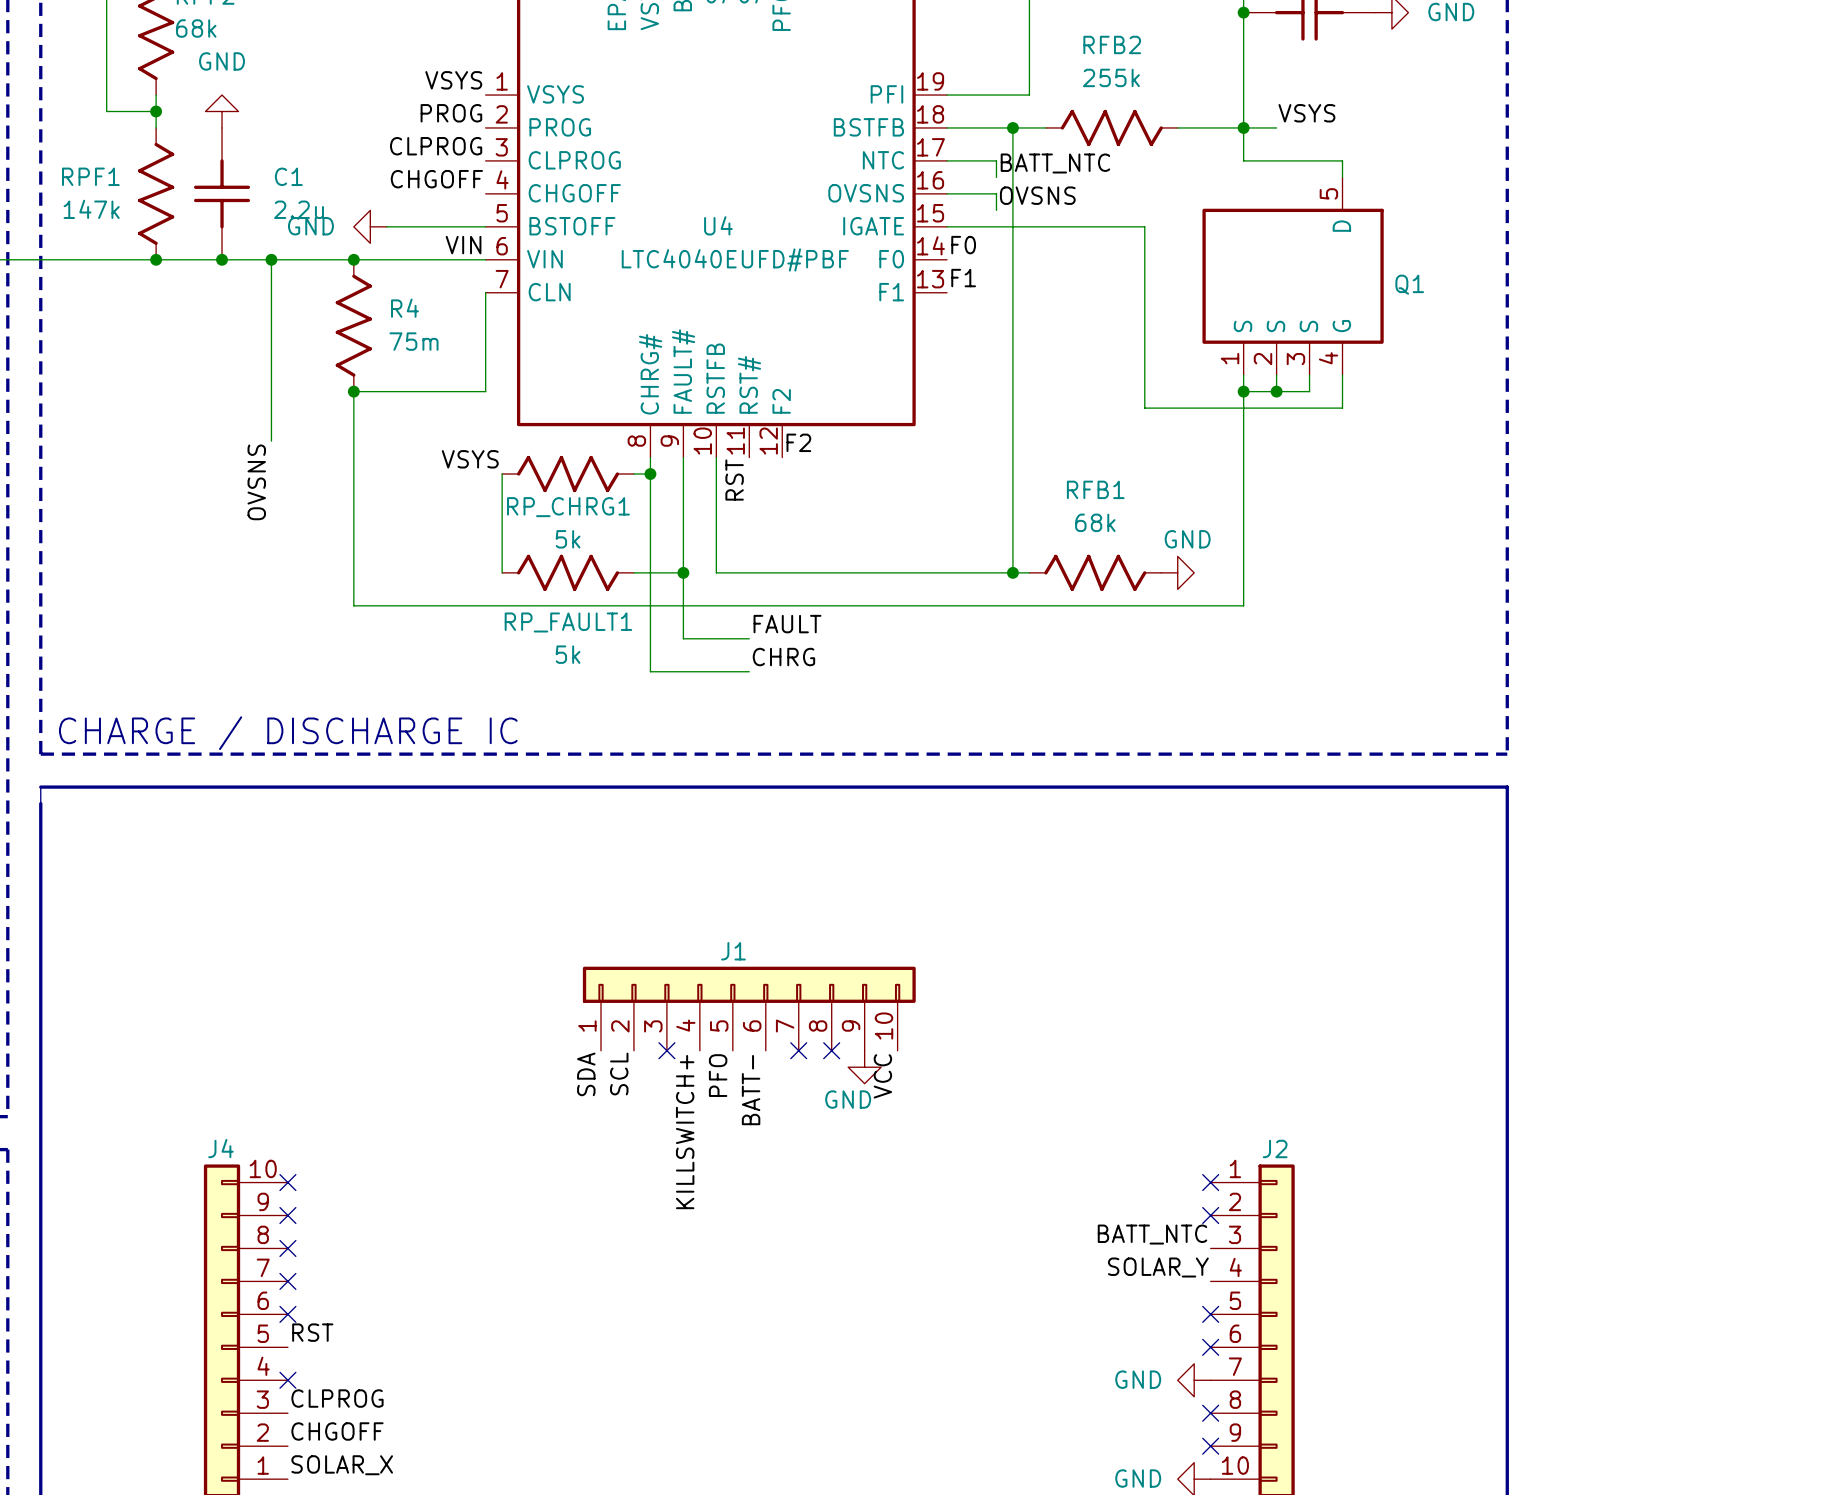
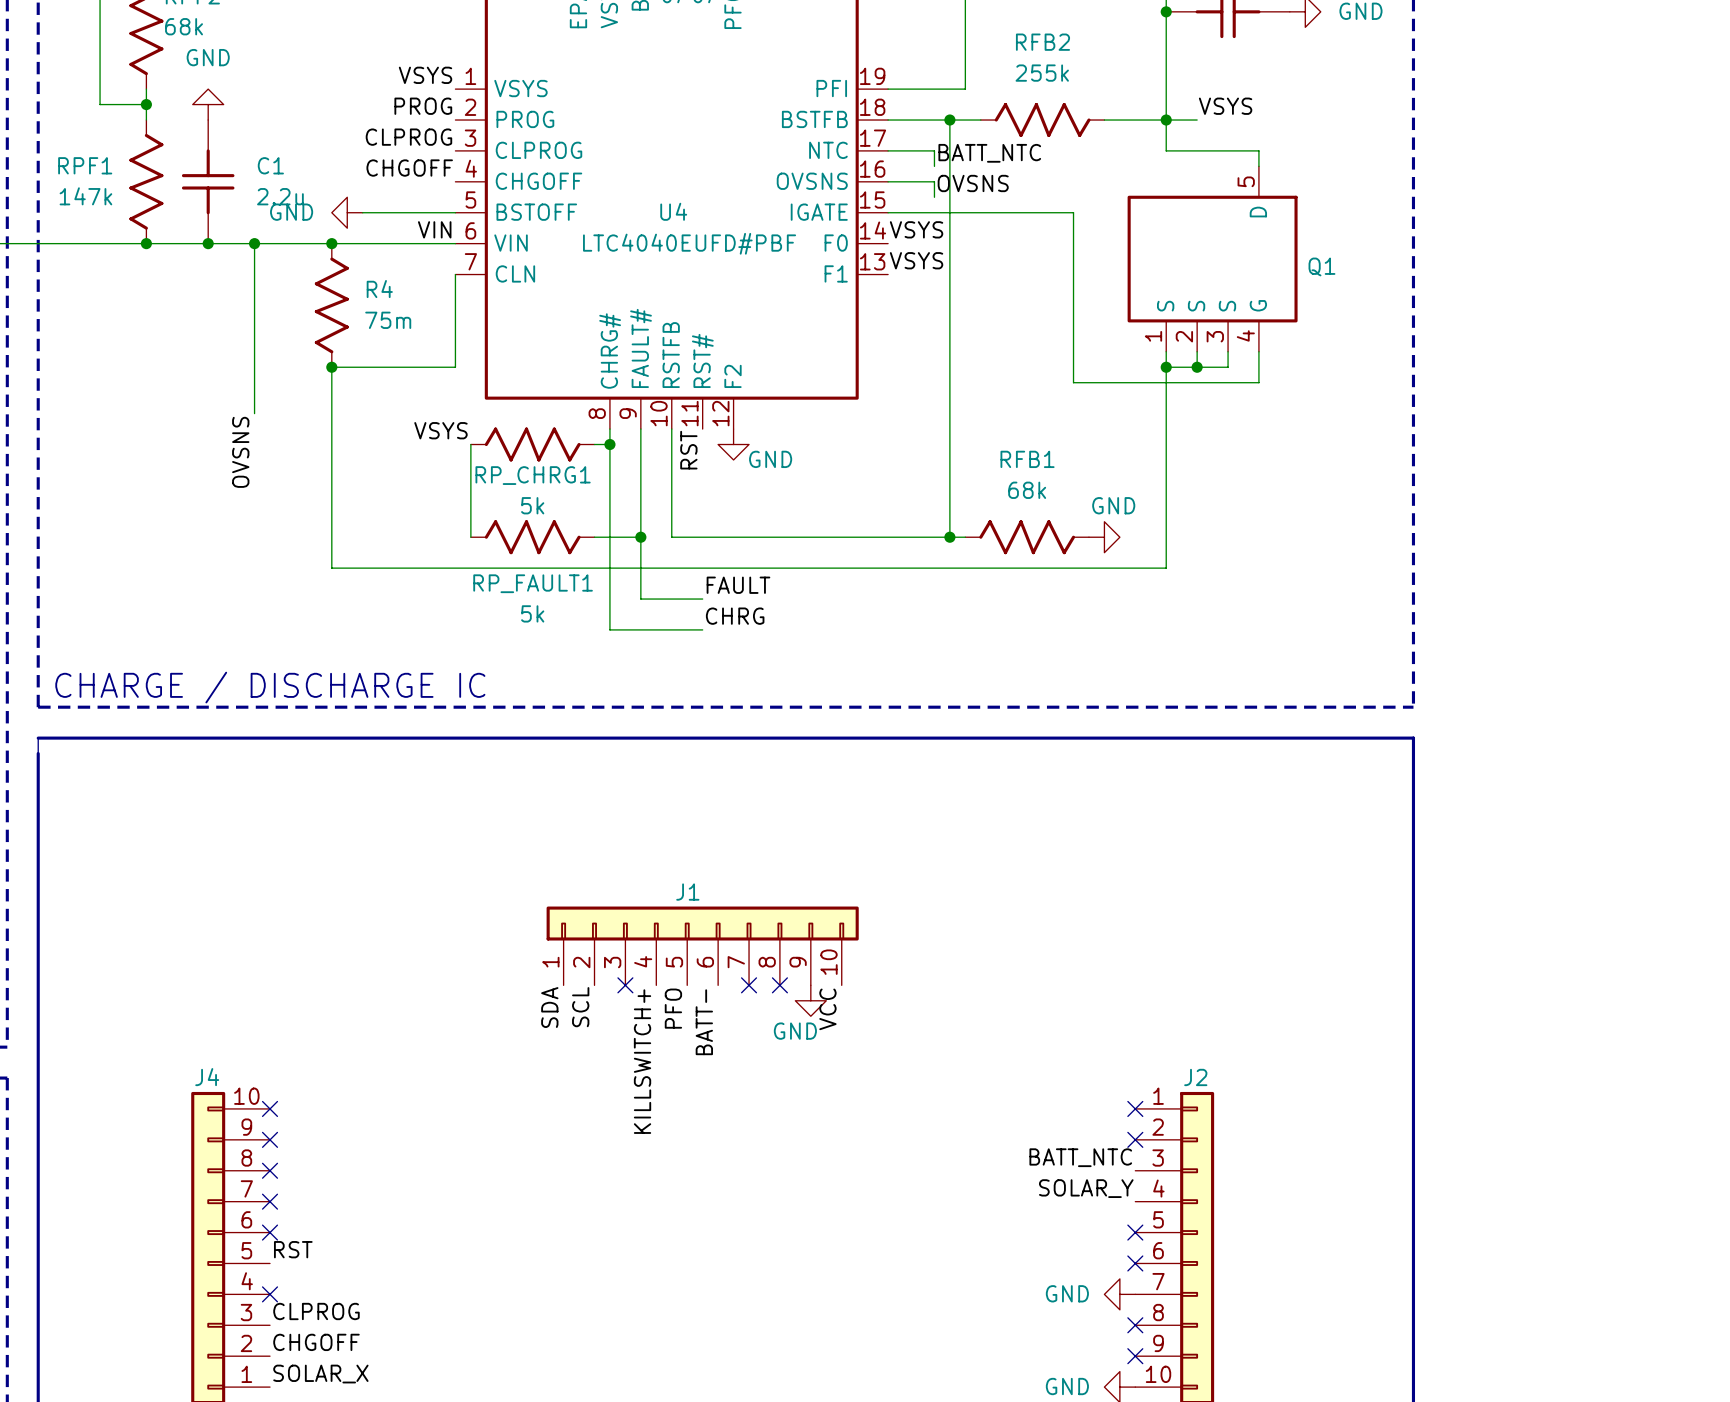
label: F0 (963, 245) -> VSYS (916, 229)
label: F1 (963, 278) -> VSYS (916, 260)
label: F2 (798, 442) -> none
power symbol: none -> GND (733, 444)

